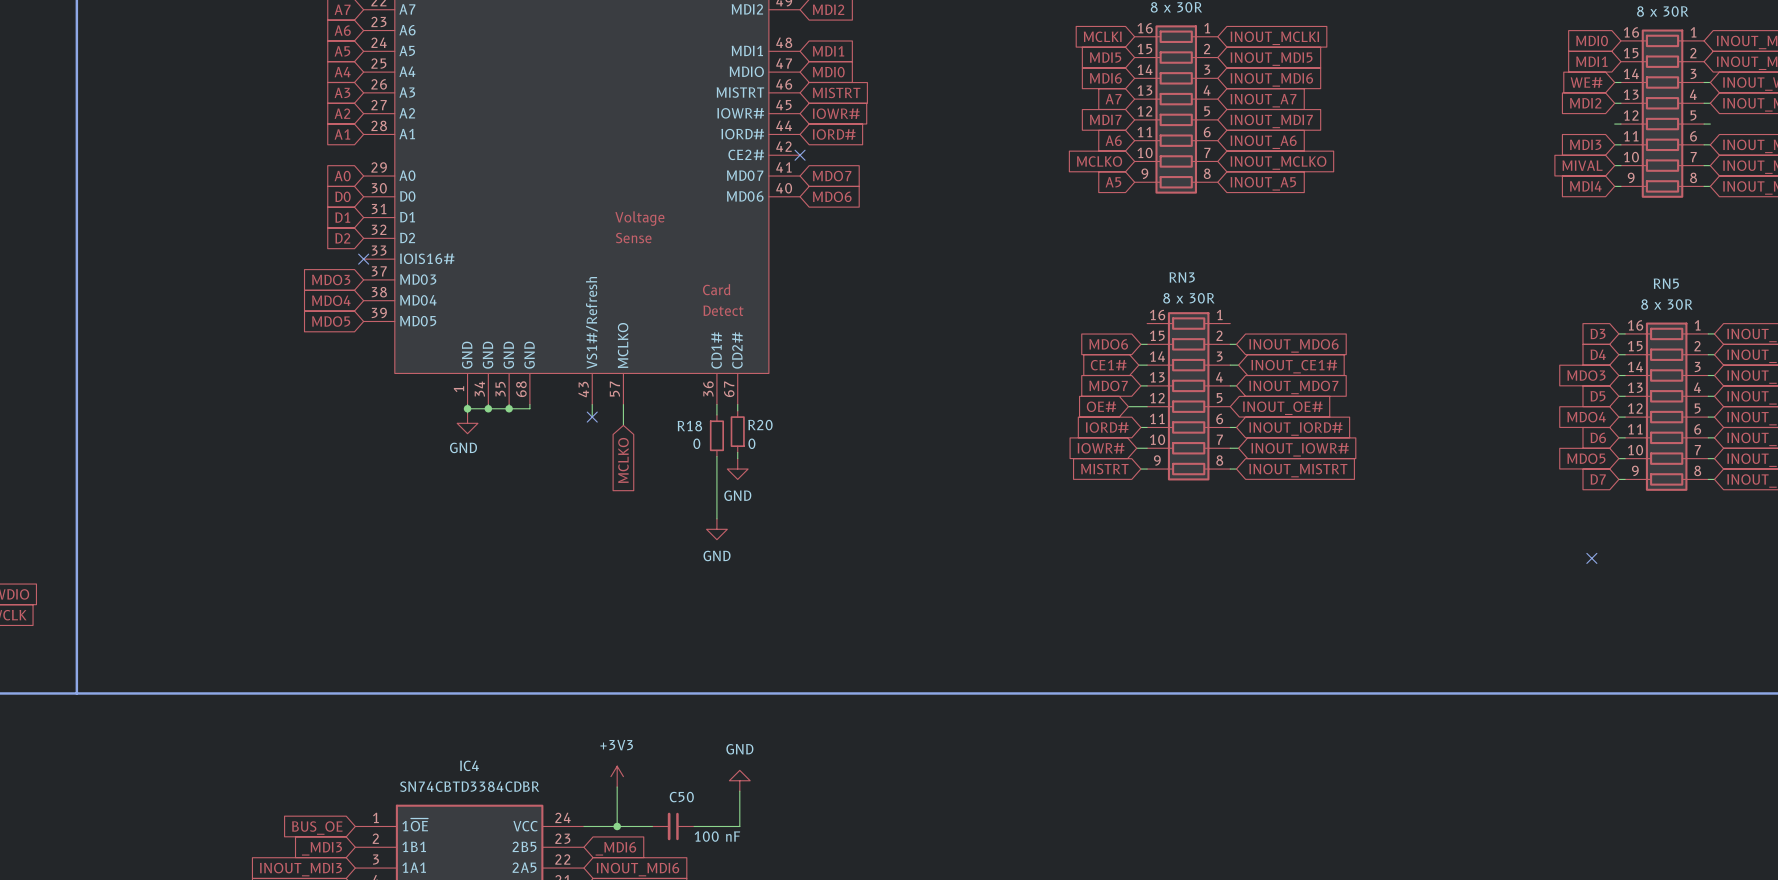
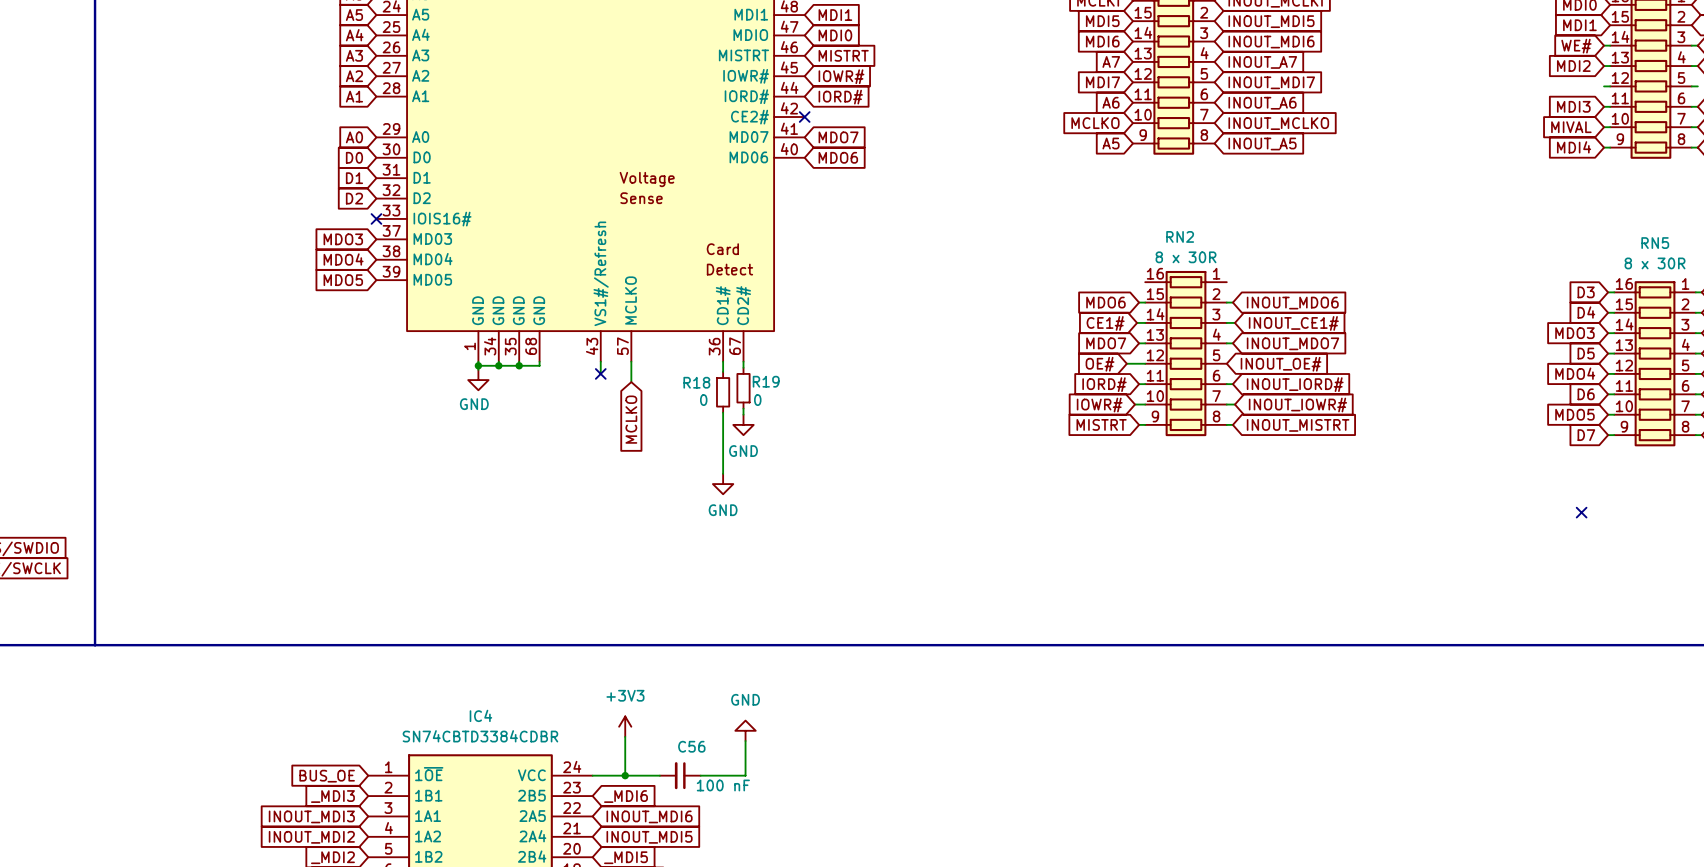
RN3 name: RN3 (1182, 277) -> RN2 (1180, 236)
R20 name: R20 (760, 425) -> R19 (766, 381)
C50 name: C50 (681, 797) -> C56 (691, 746)

